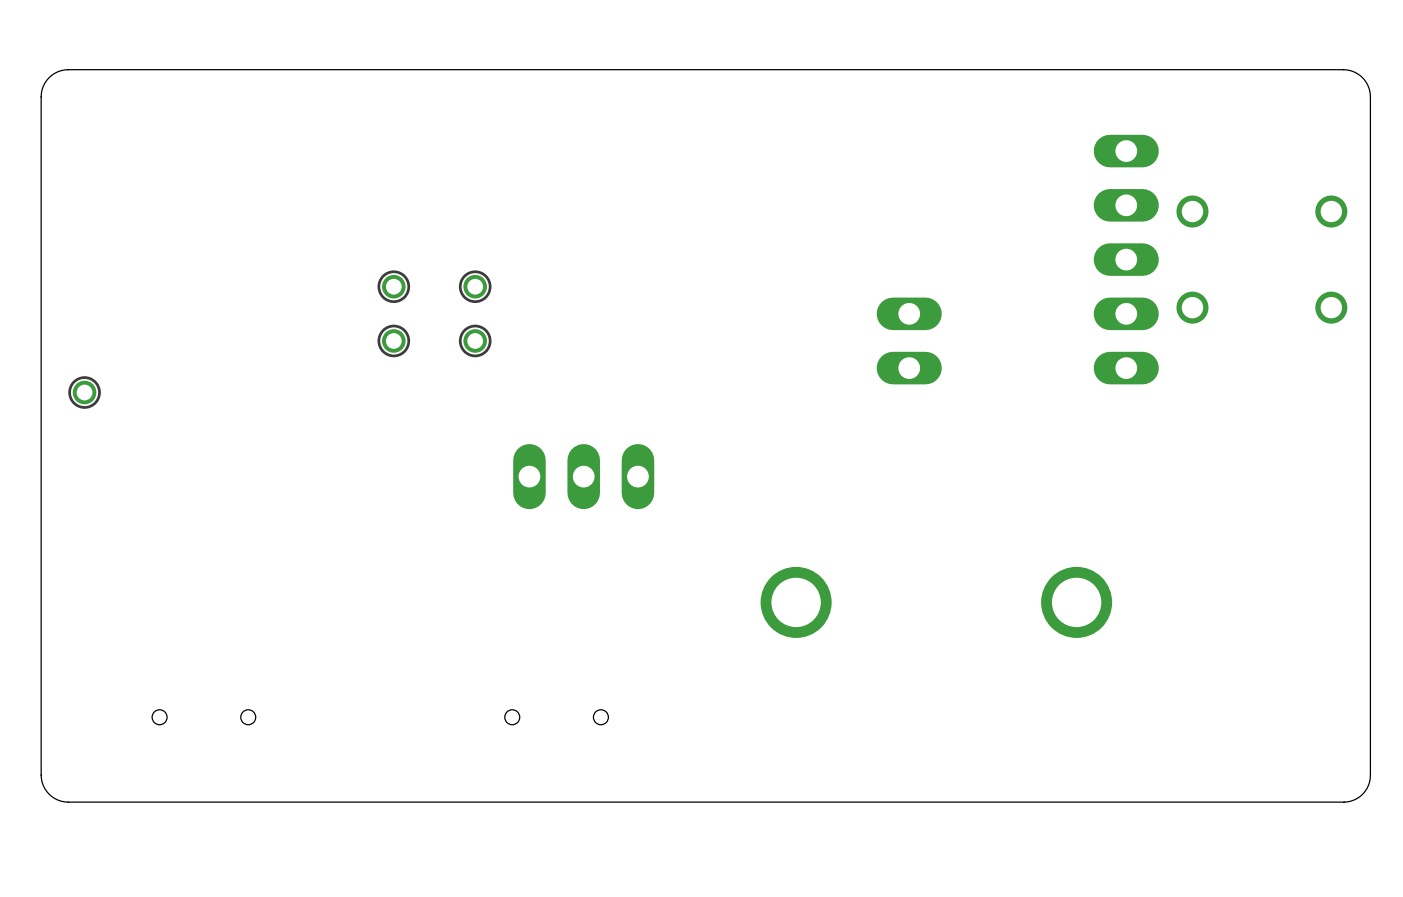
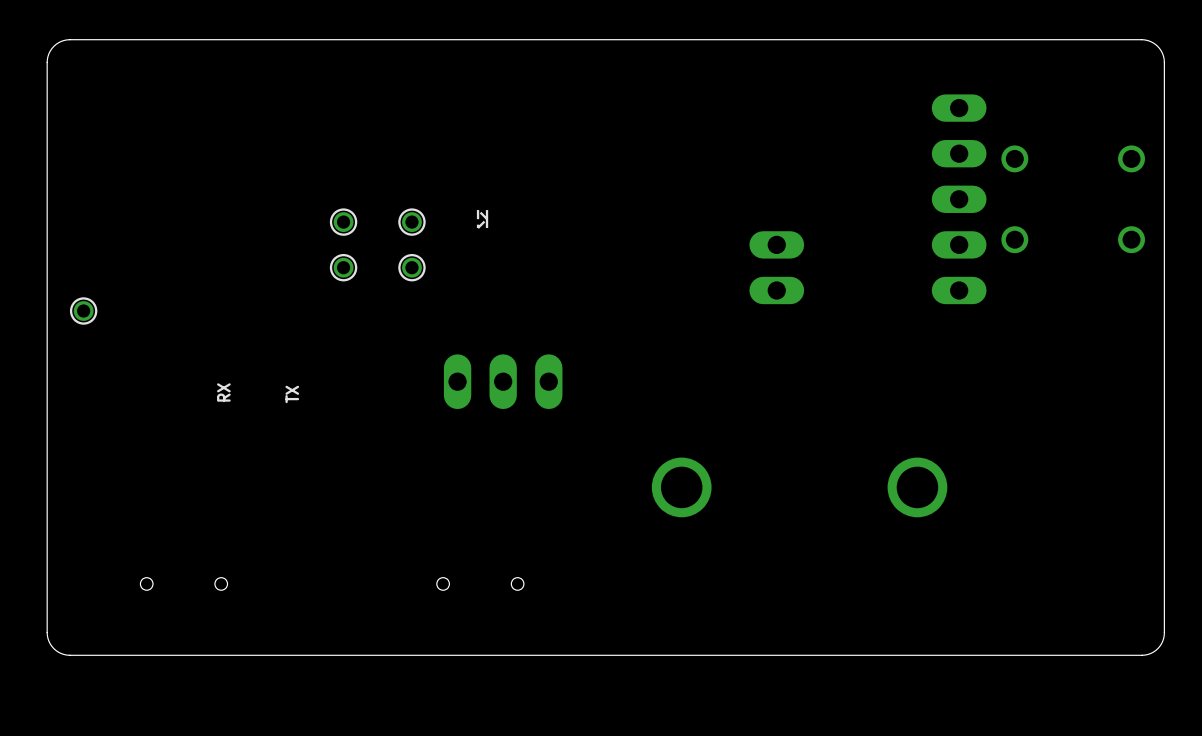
line: none -> (478, 210) (478, 228) (487, 219) (478, 210)
line: none -> (487, 210) (487, 228)
text: none -> RX (223, 392)
text: none -> TX (292, 394)

